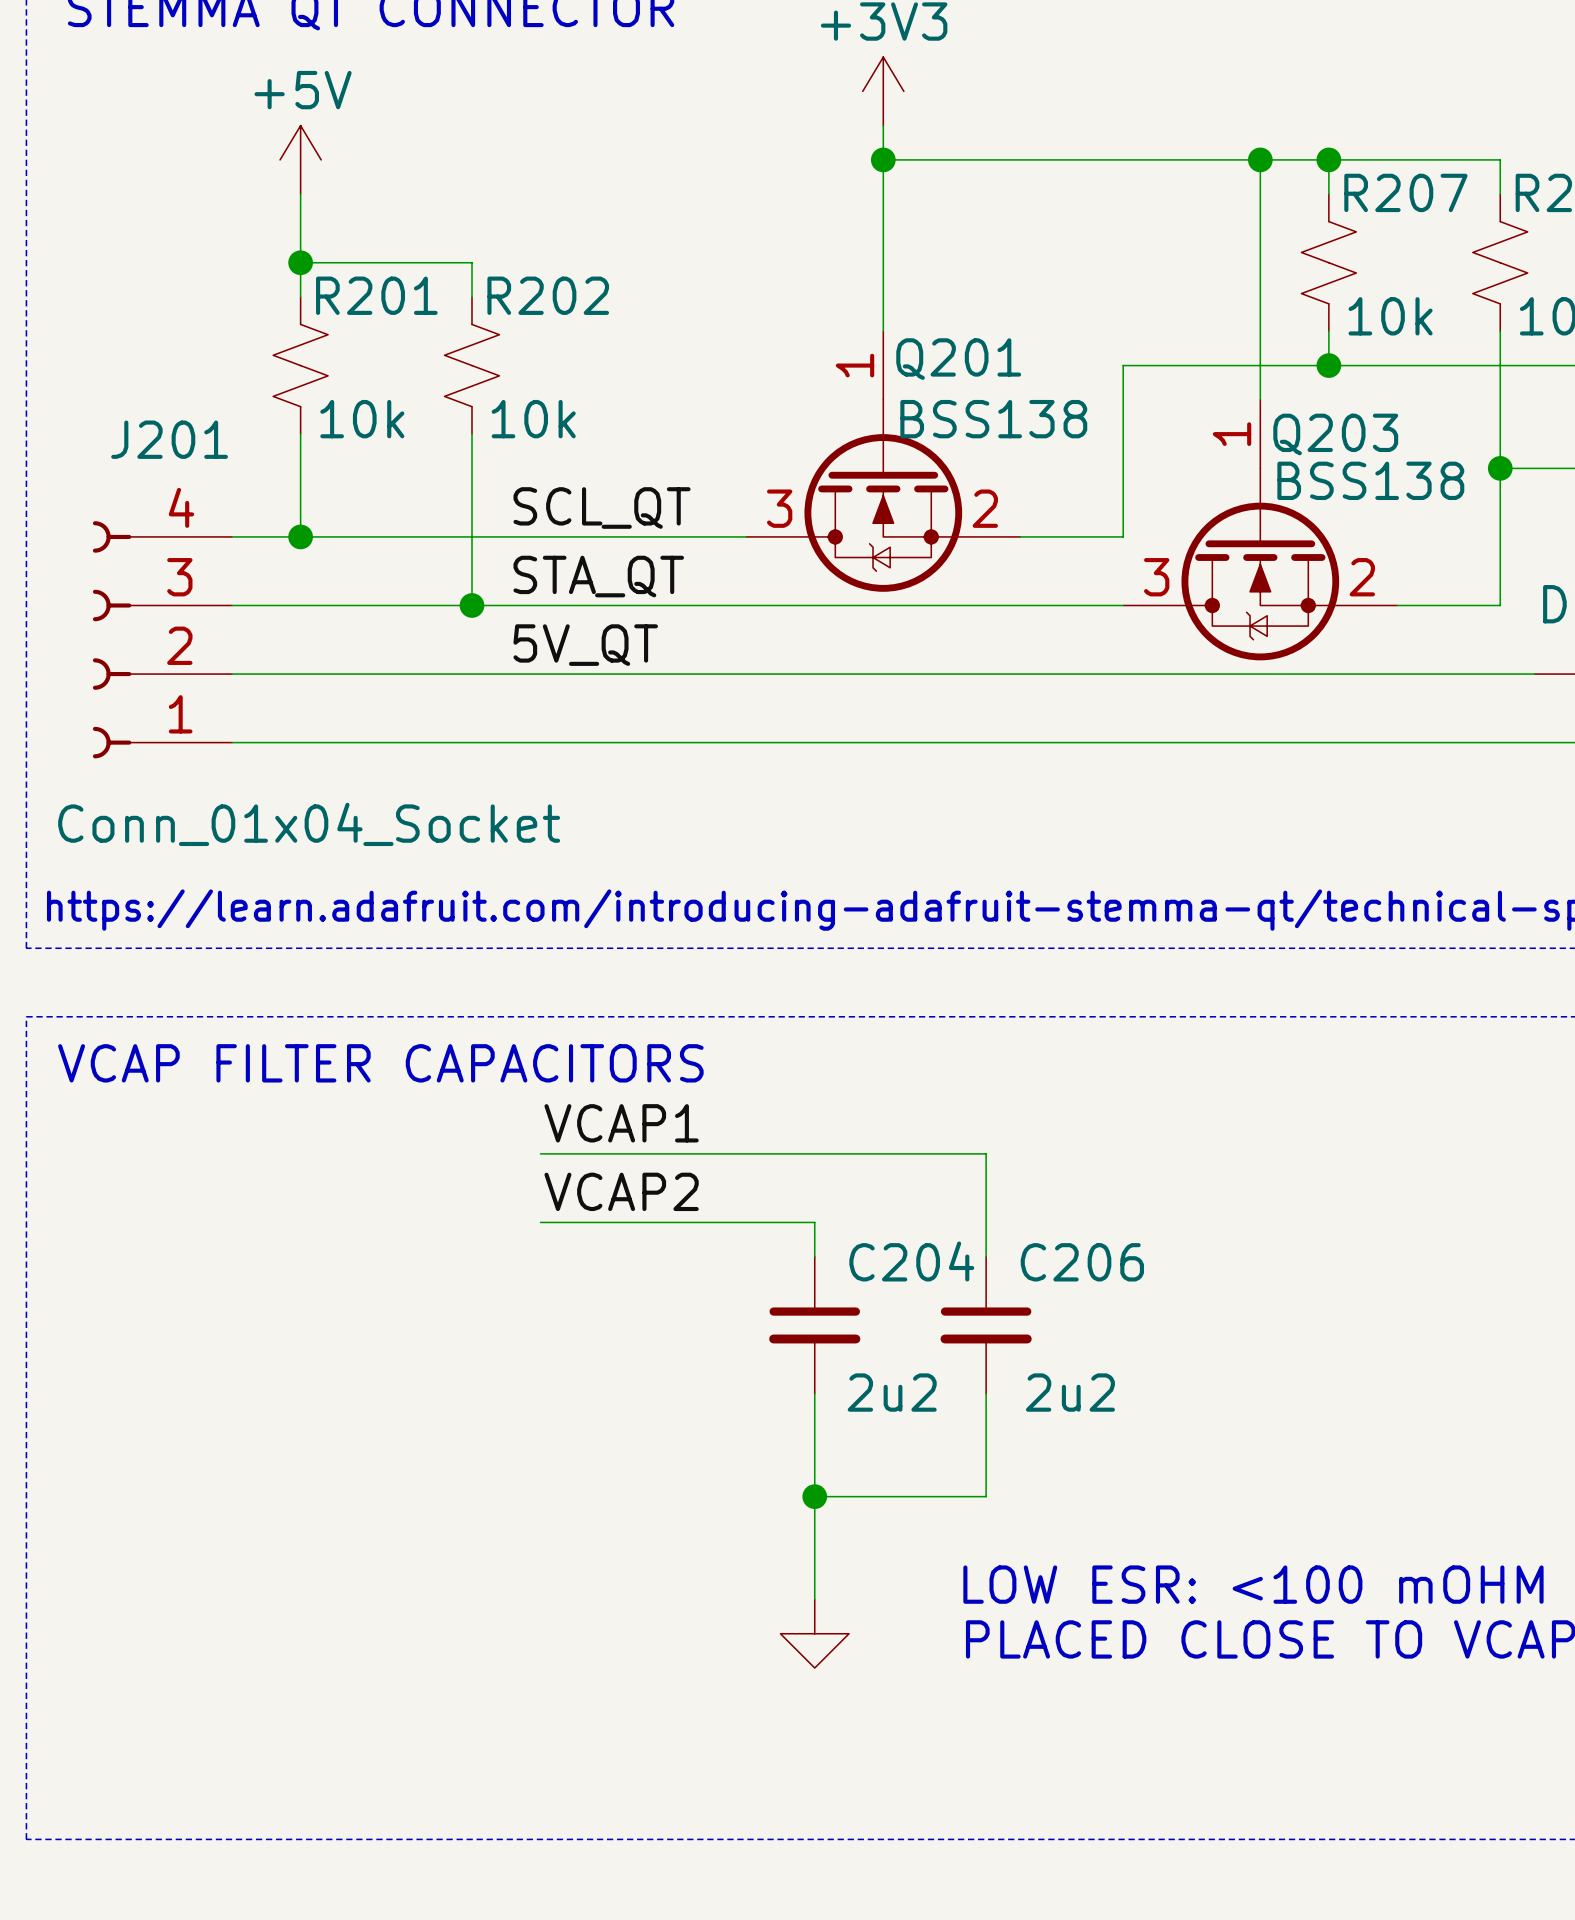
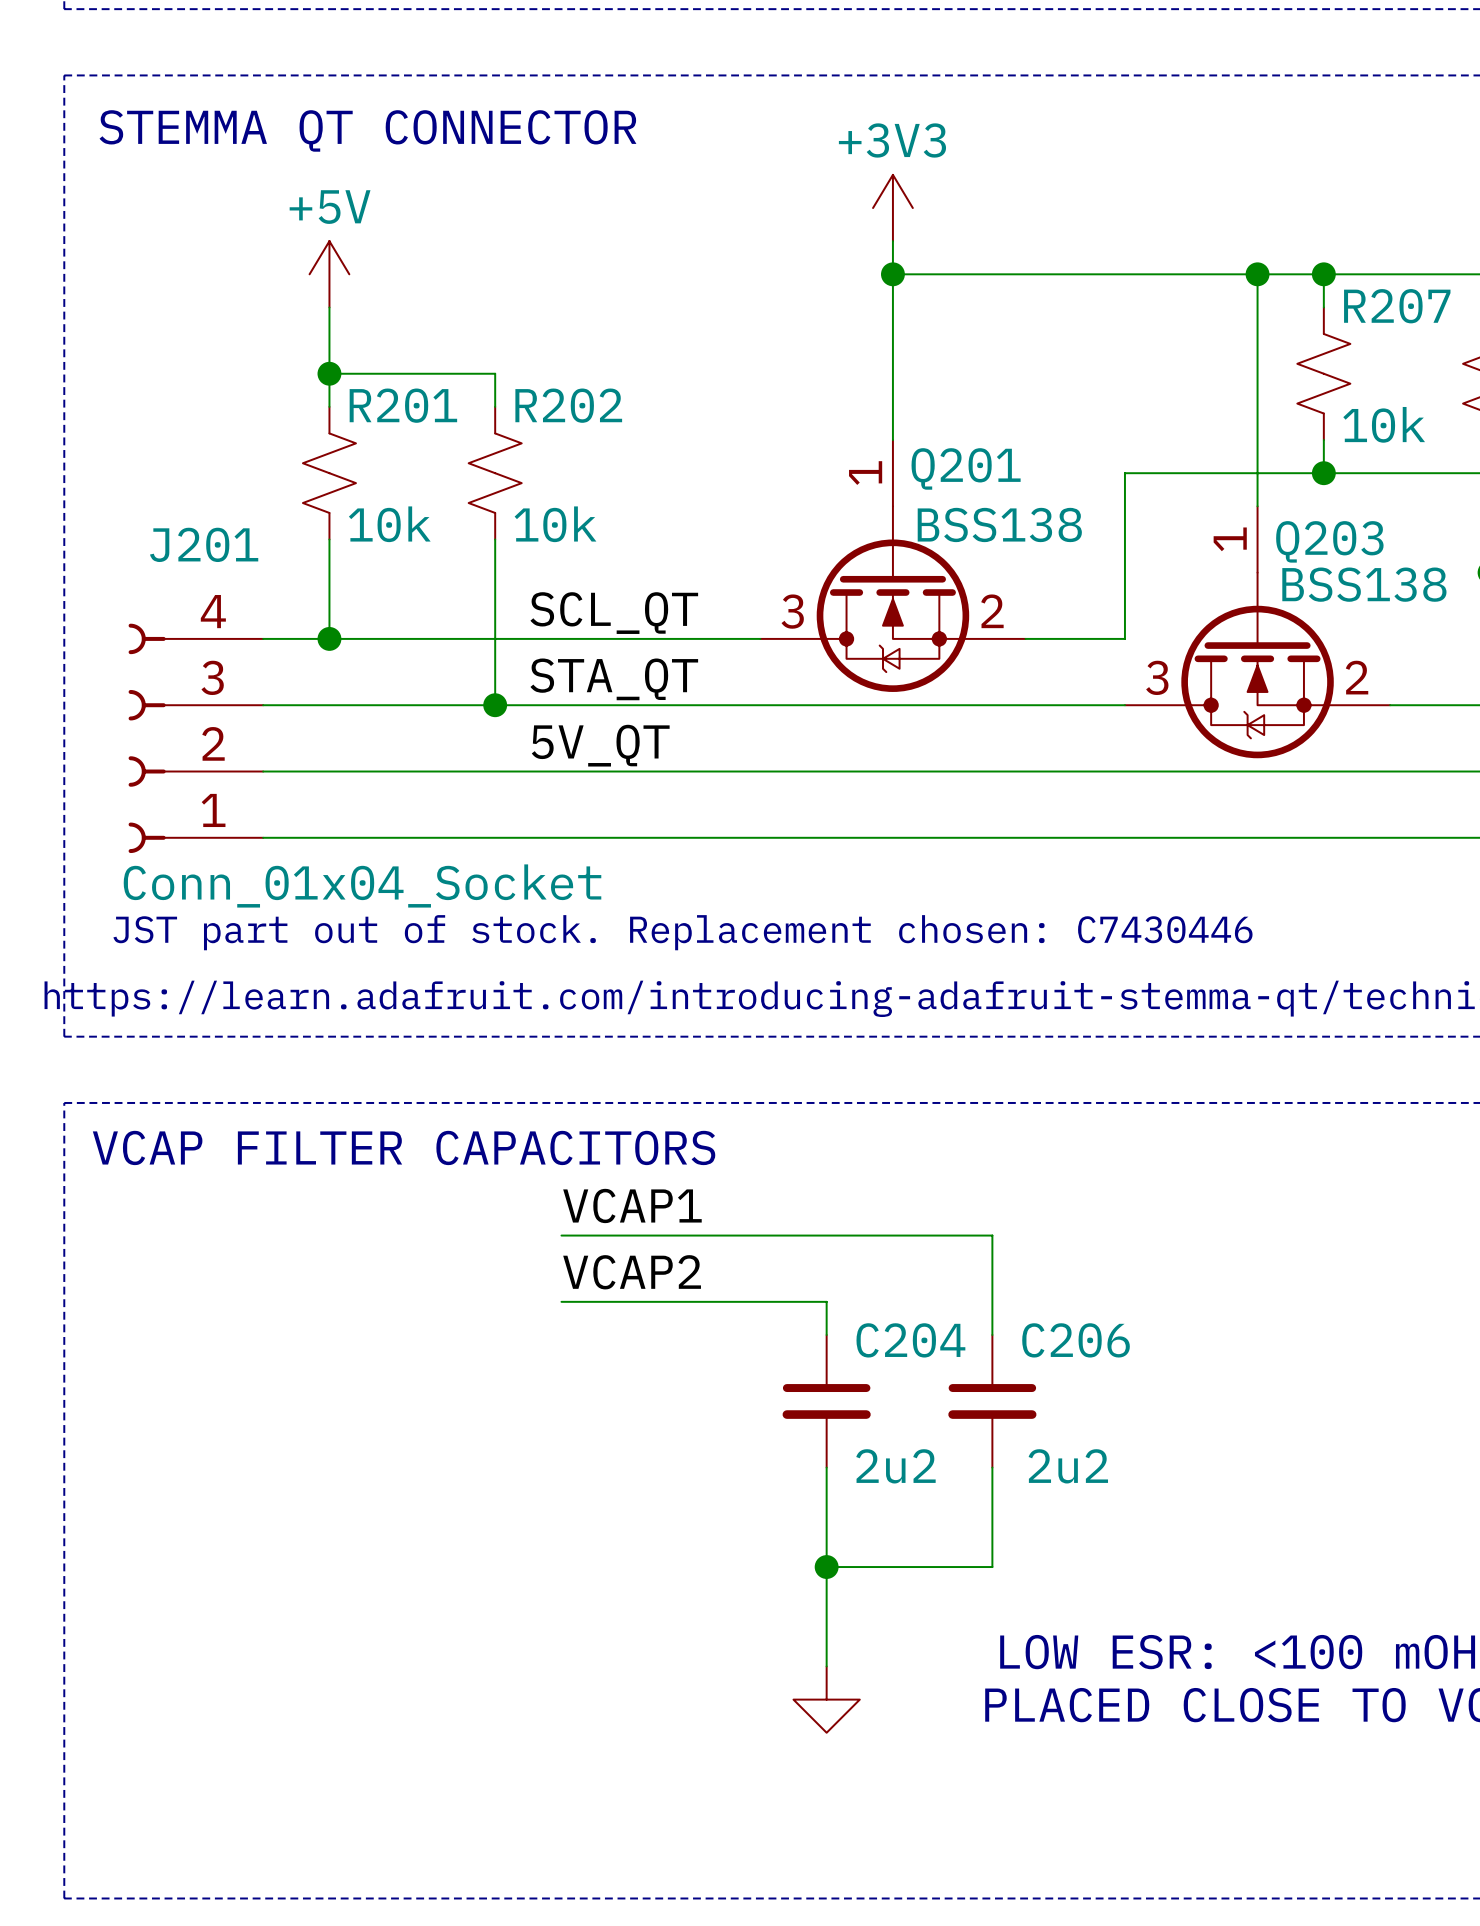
J201 value position: Conn_01x04_Socket (309, 824) -> Conn_01x04_Socket (362, 885)
text: none -> JST part out of stock. Replacement chosen: C7430446 (682, 932)

